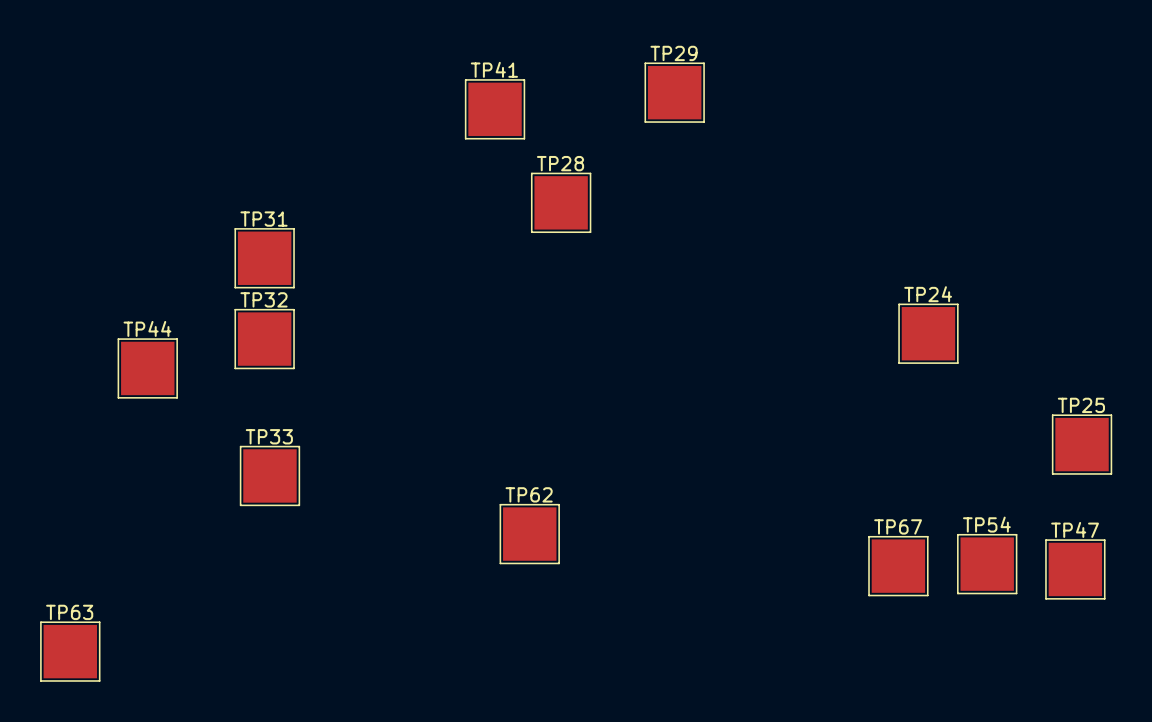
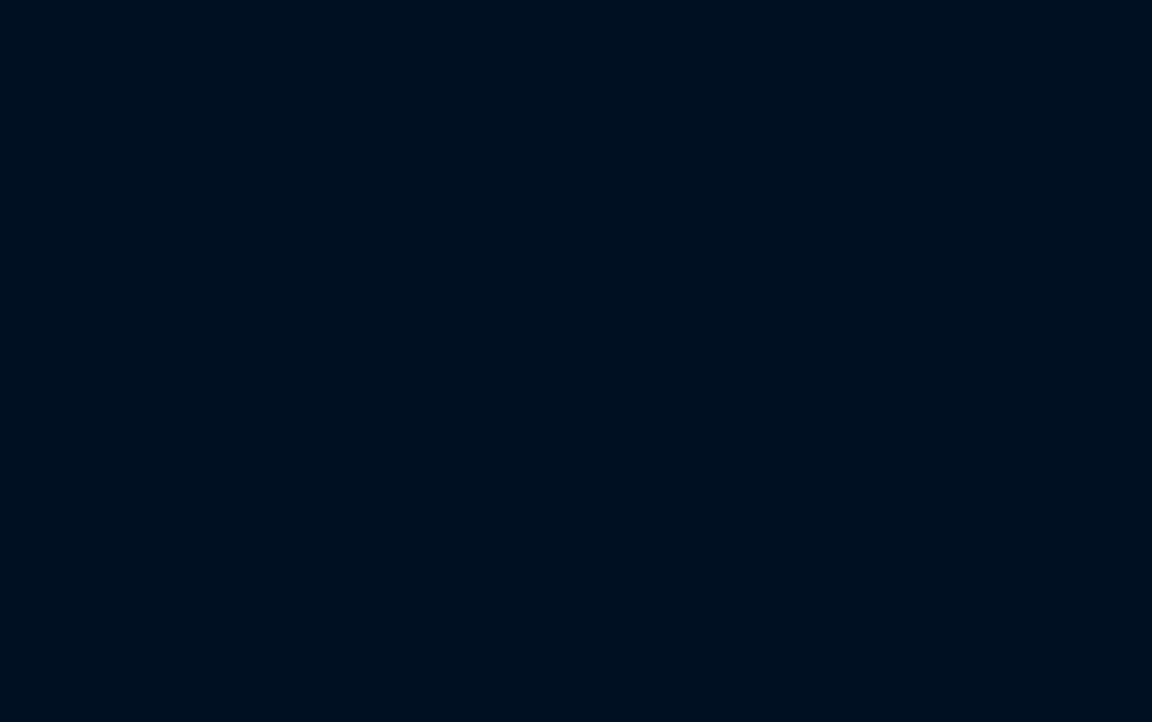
TP29: (674, 92) -> none
TP41: (495, 109) -> none
TP28: (561, 202) -> none
TP31: (264, 258) -> none
TP24: (928, 333) -> none
TP32: (264, 339) -> none
TP44: (147, 368) -> none
TP25: (1082, 444) -> none
TP33: (269, 475) -> none
TP62: (529, 534) -> none
TP54: (987, 564) -> none
TP67: (898, 566) -> none
TP47: (1075, 569) -> none
TP63: (70, 651) -> none

